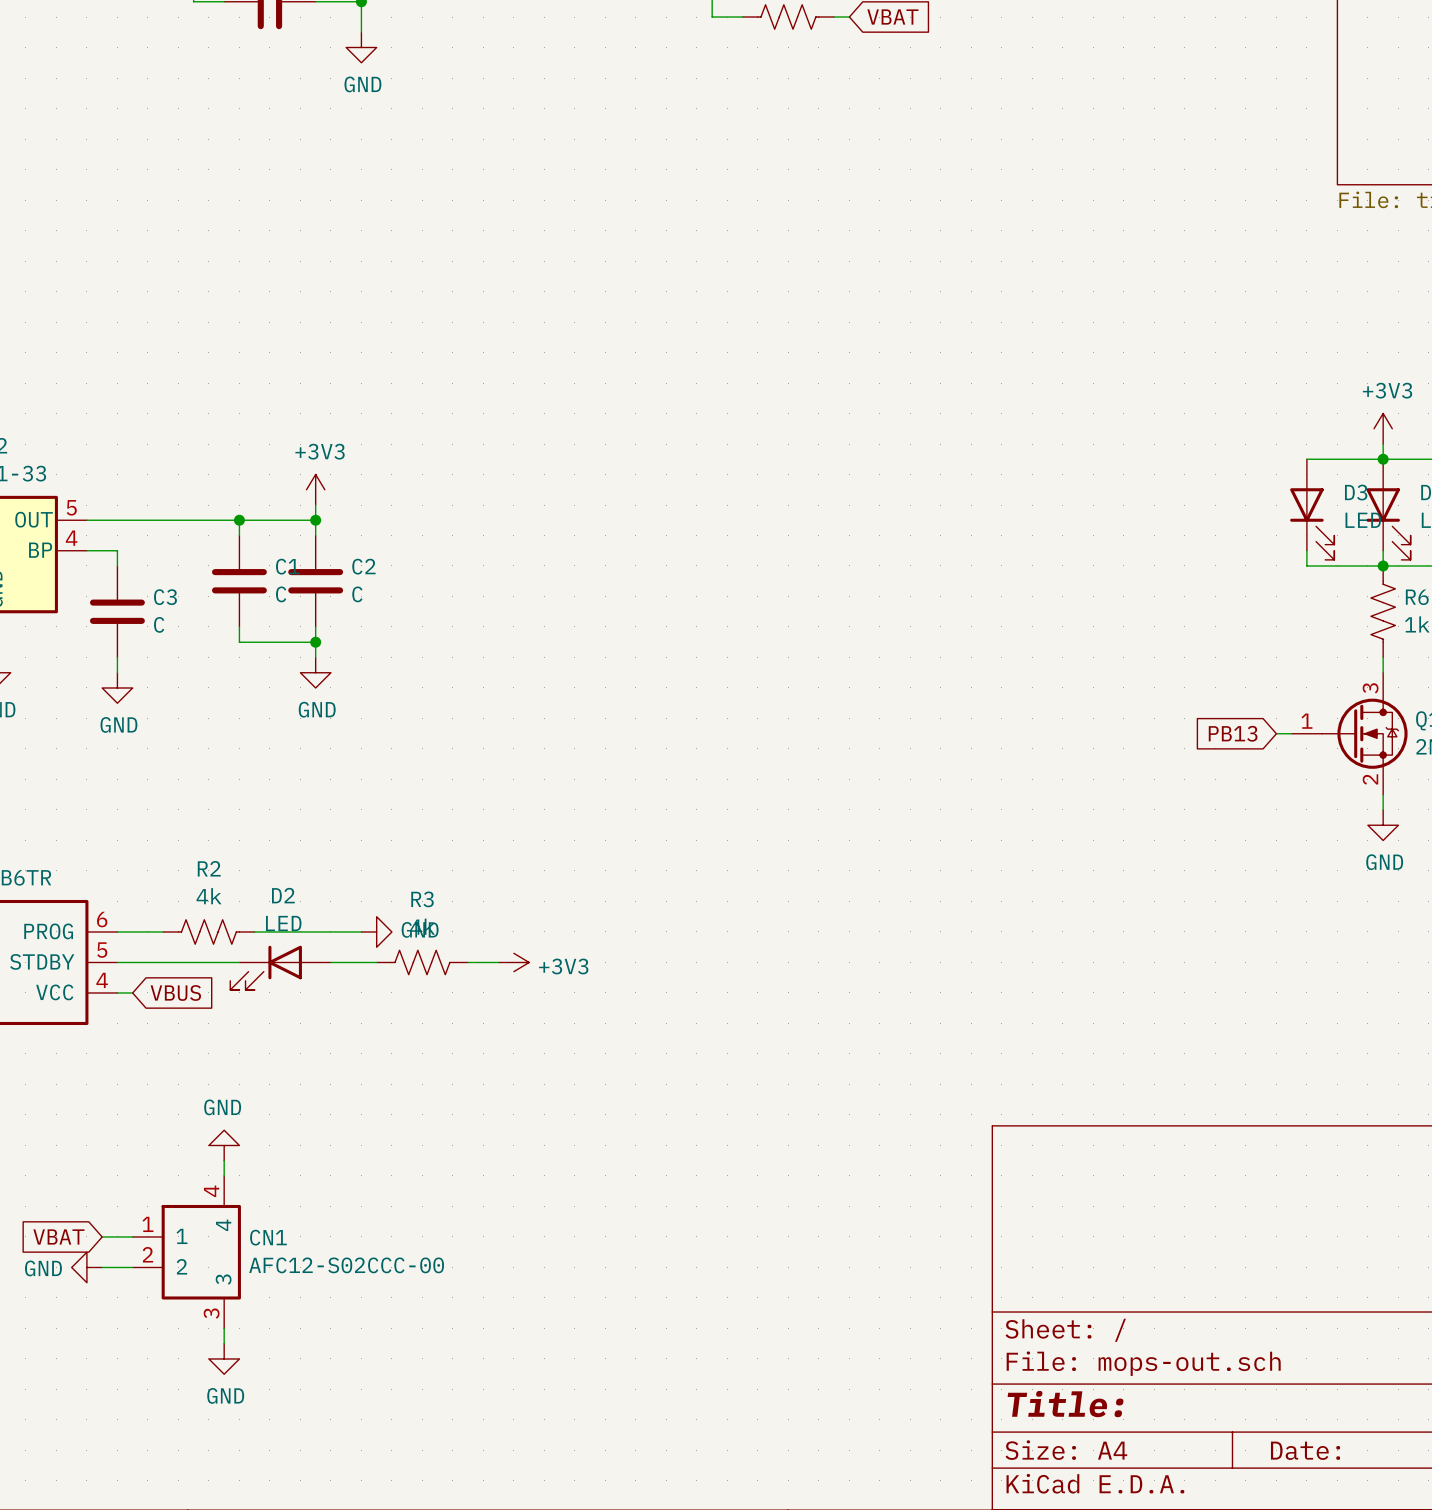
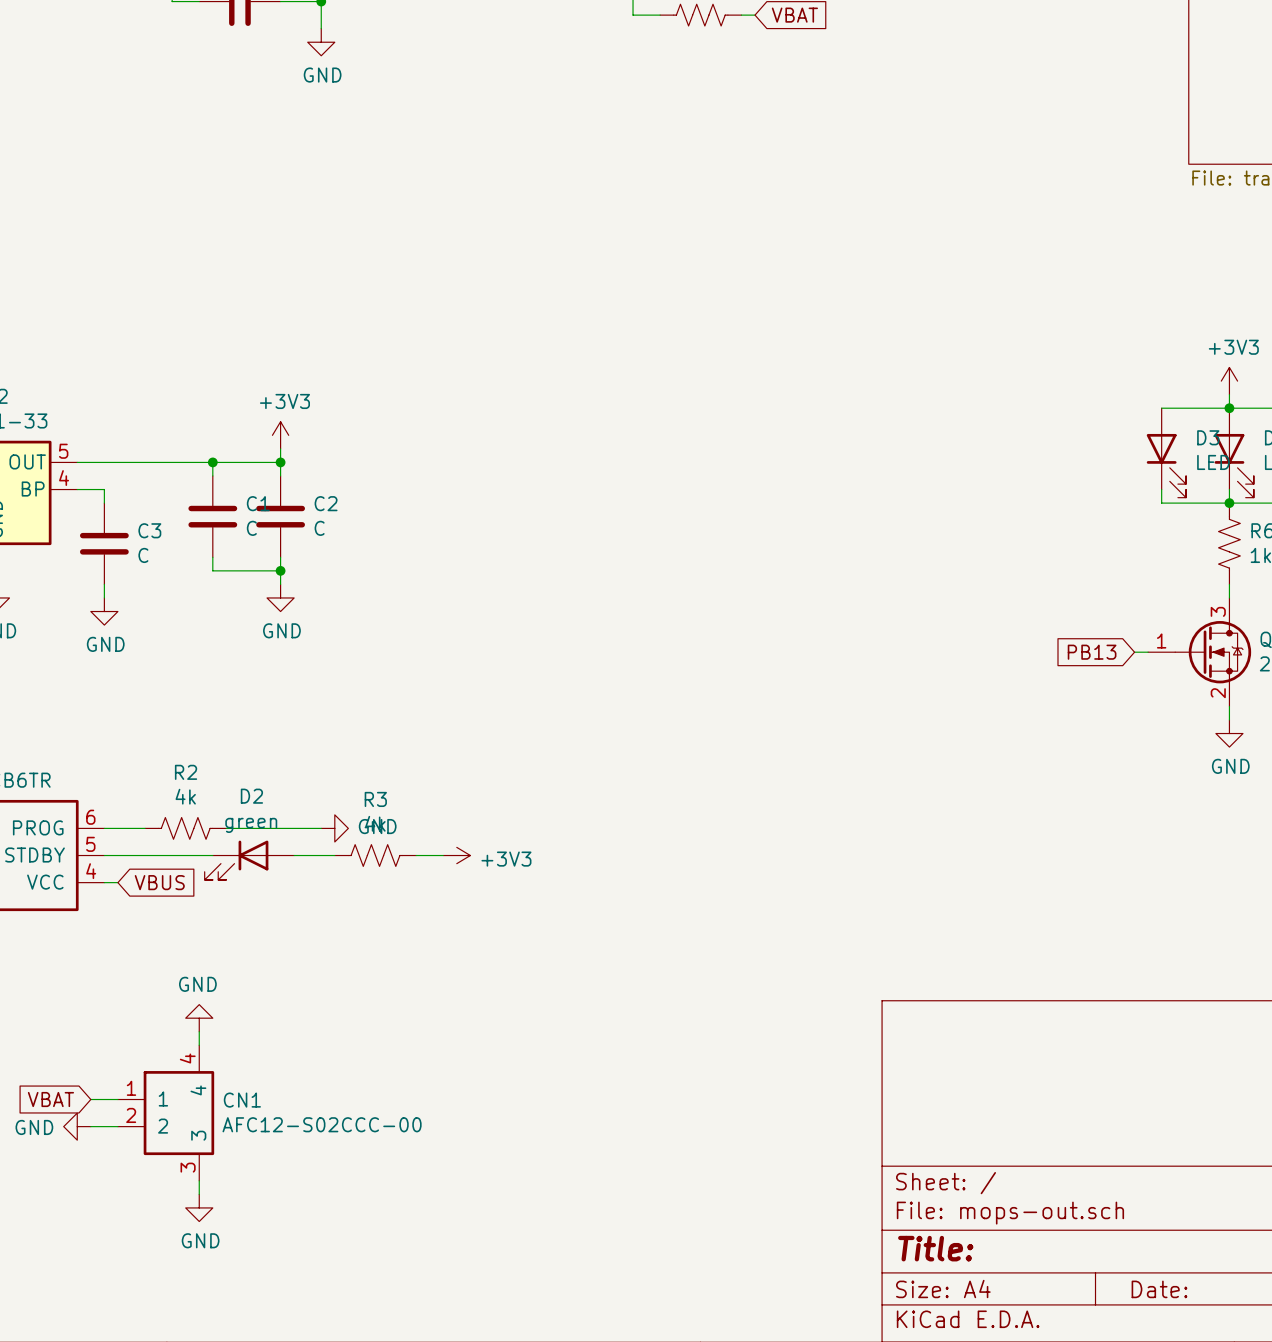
D2 value: LED (283, 923) -> green (251, 825)

